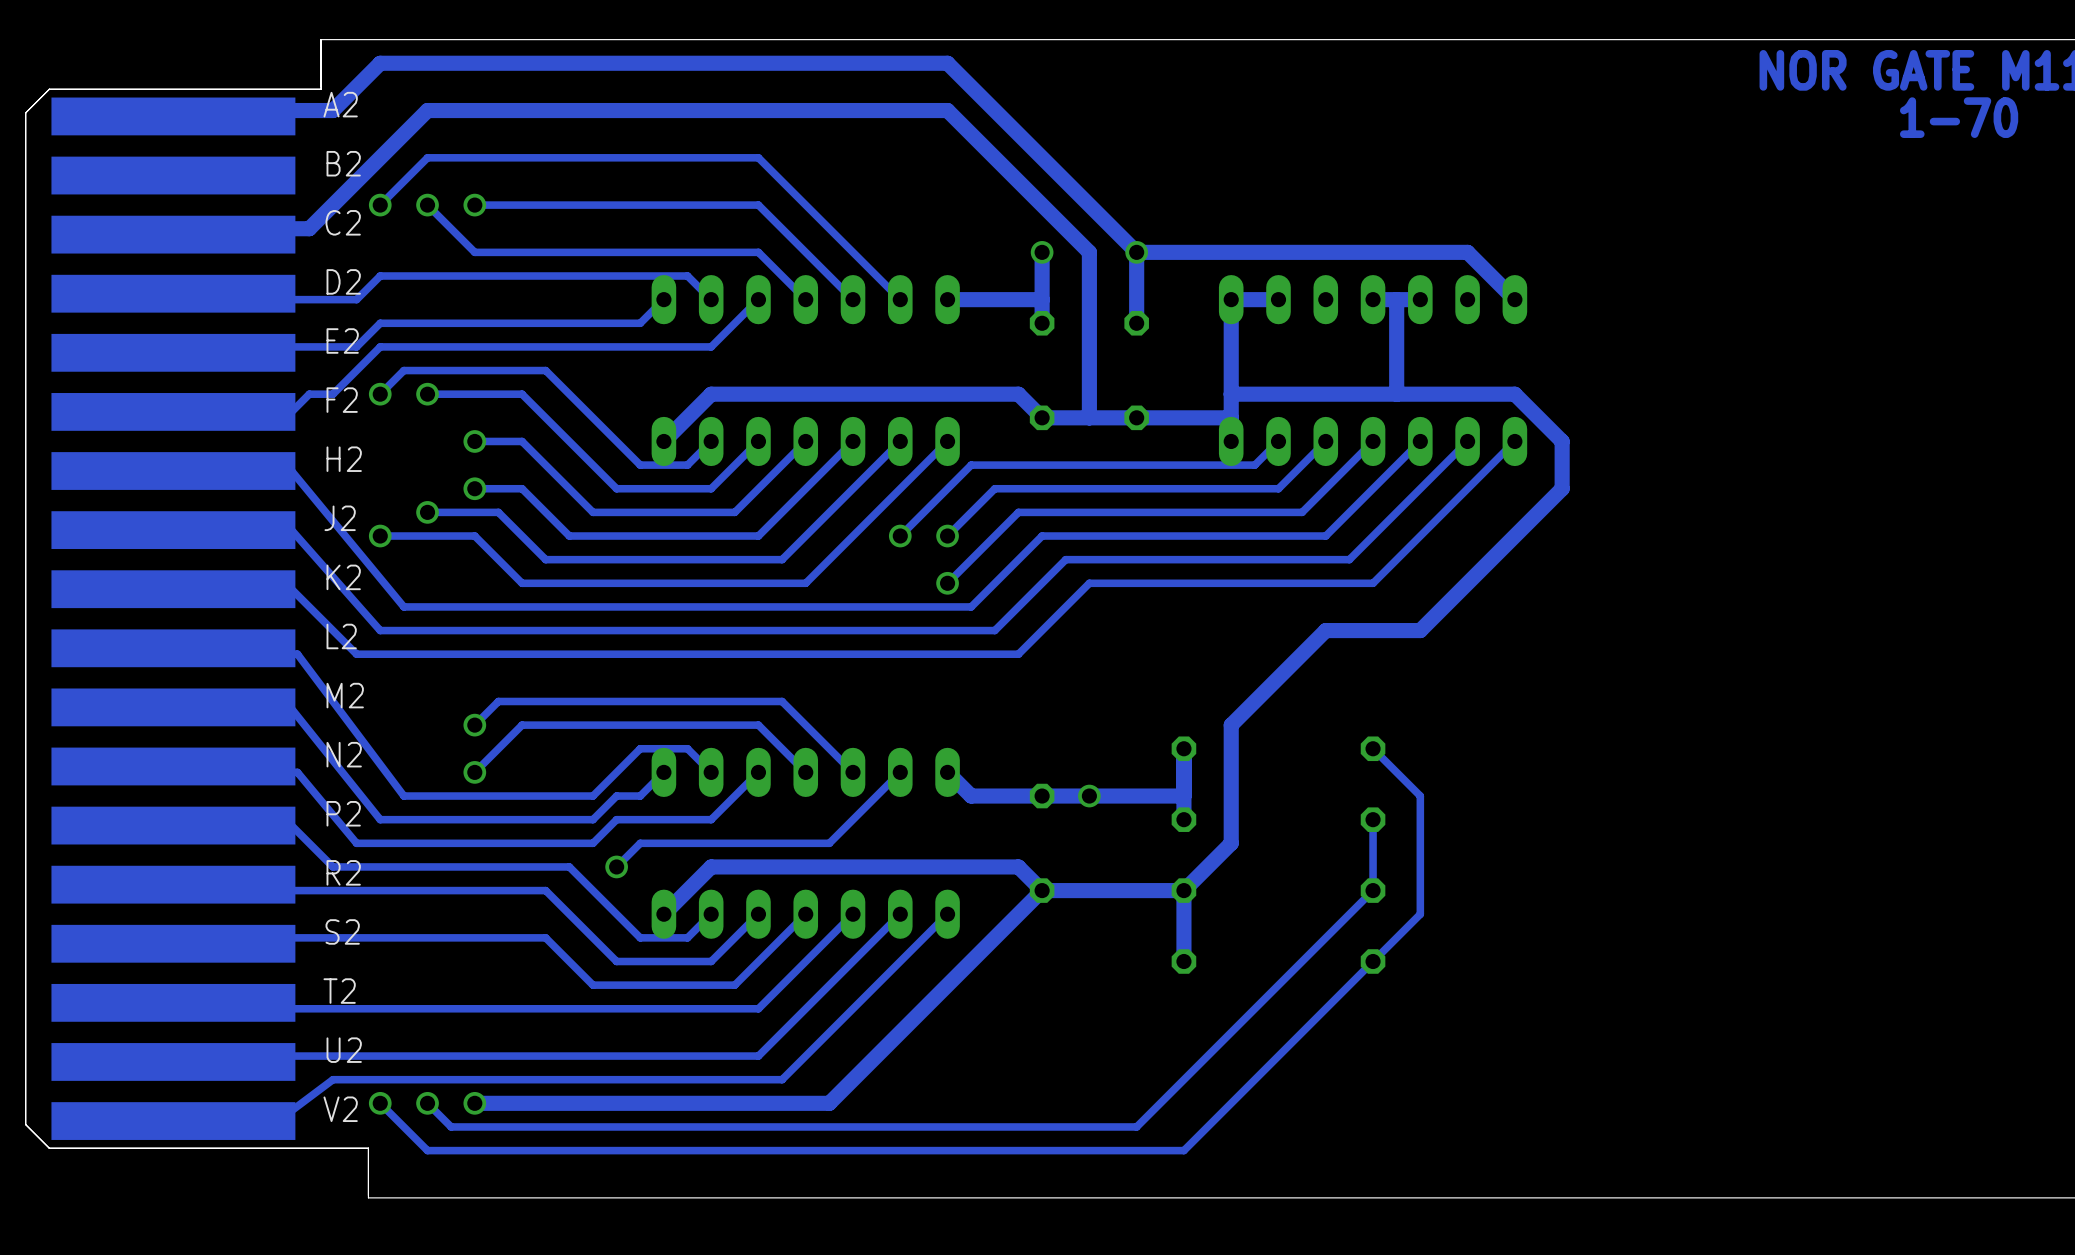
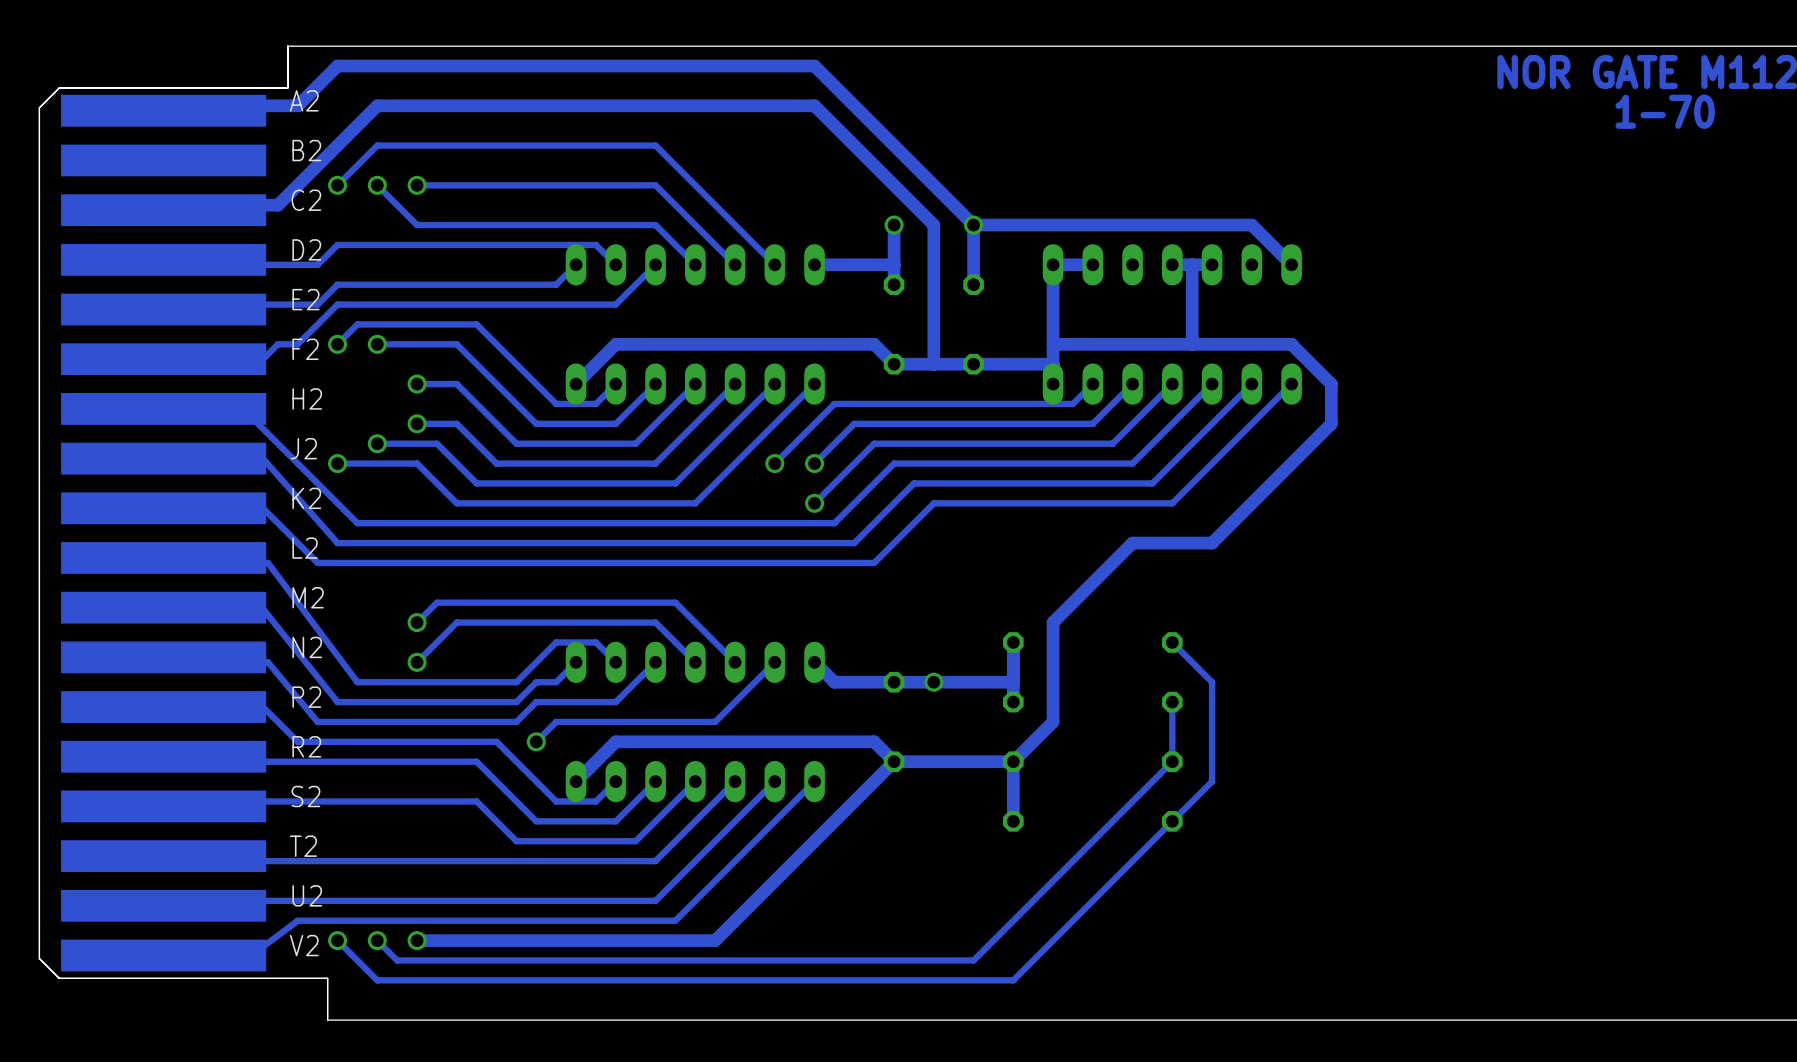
track: (173, 471) (291, 471) (403, 606) -> (163, 408) (243, 409) (357, 523)

